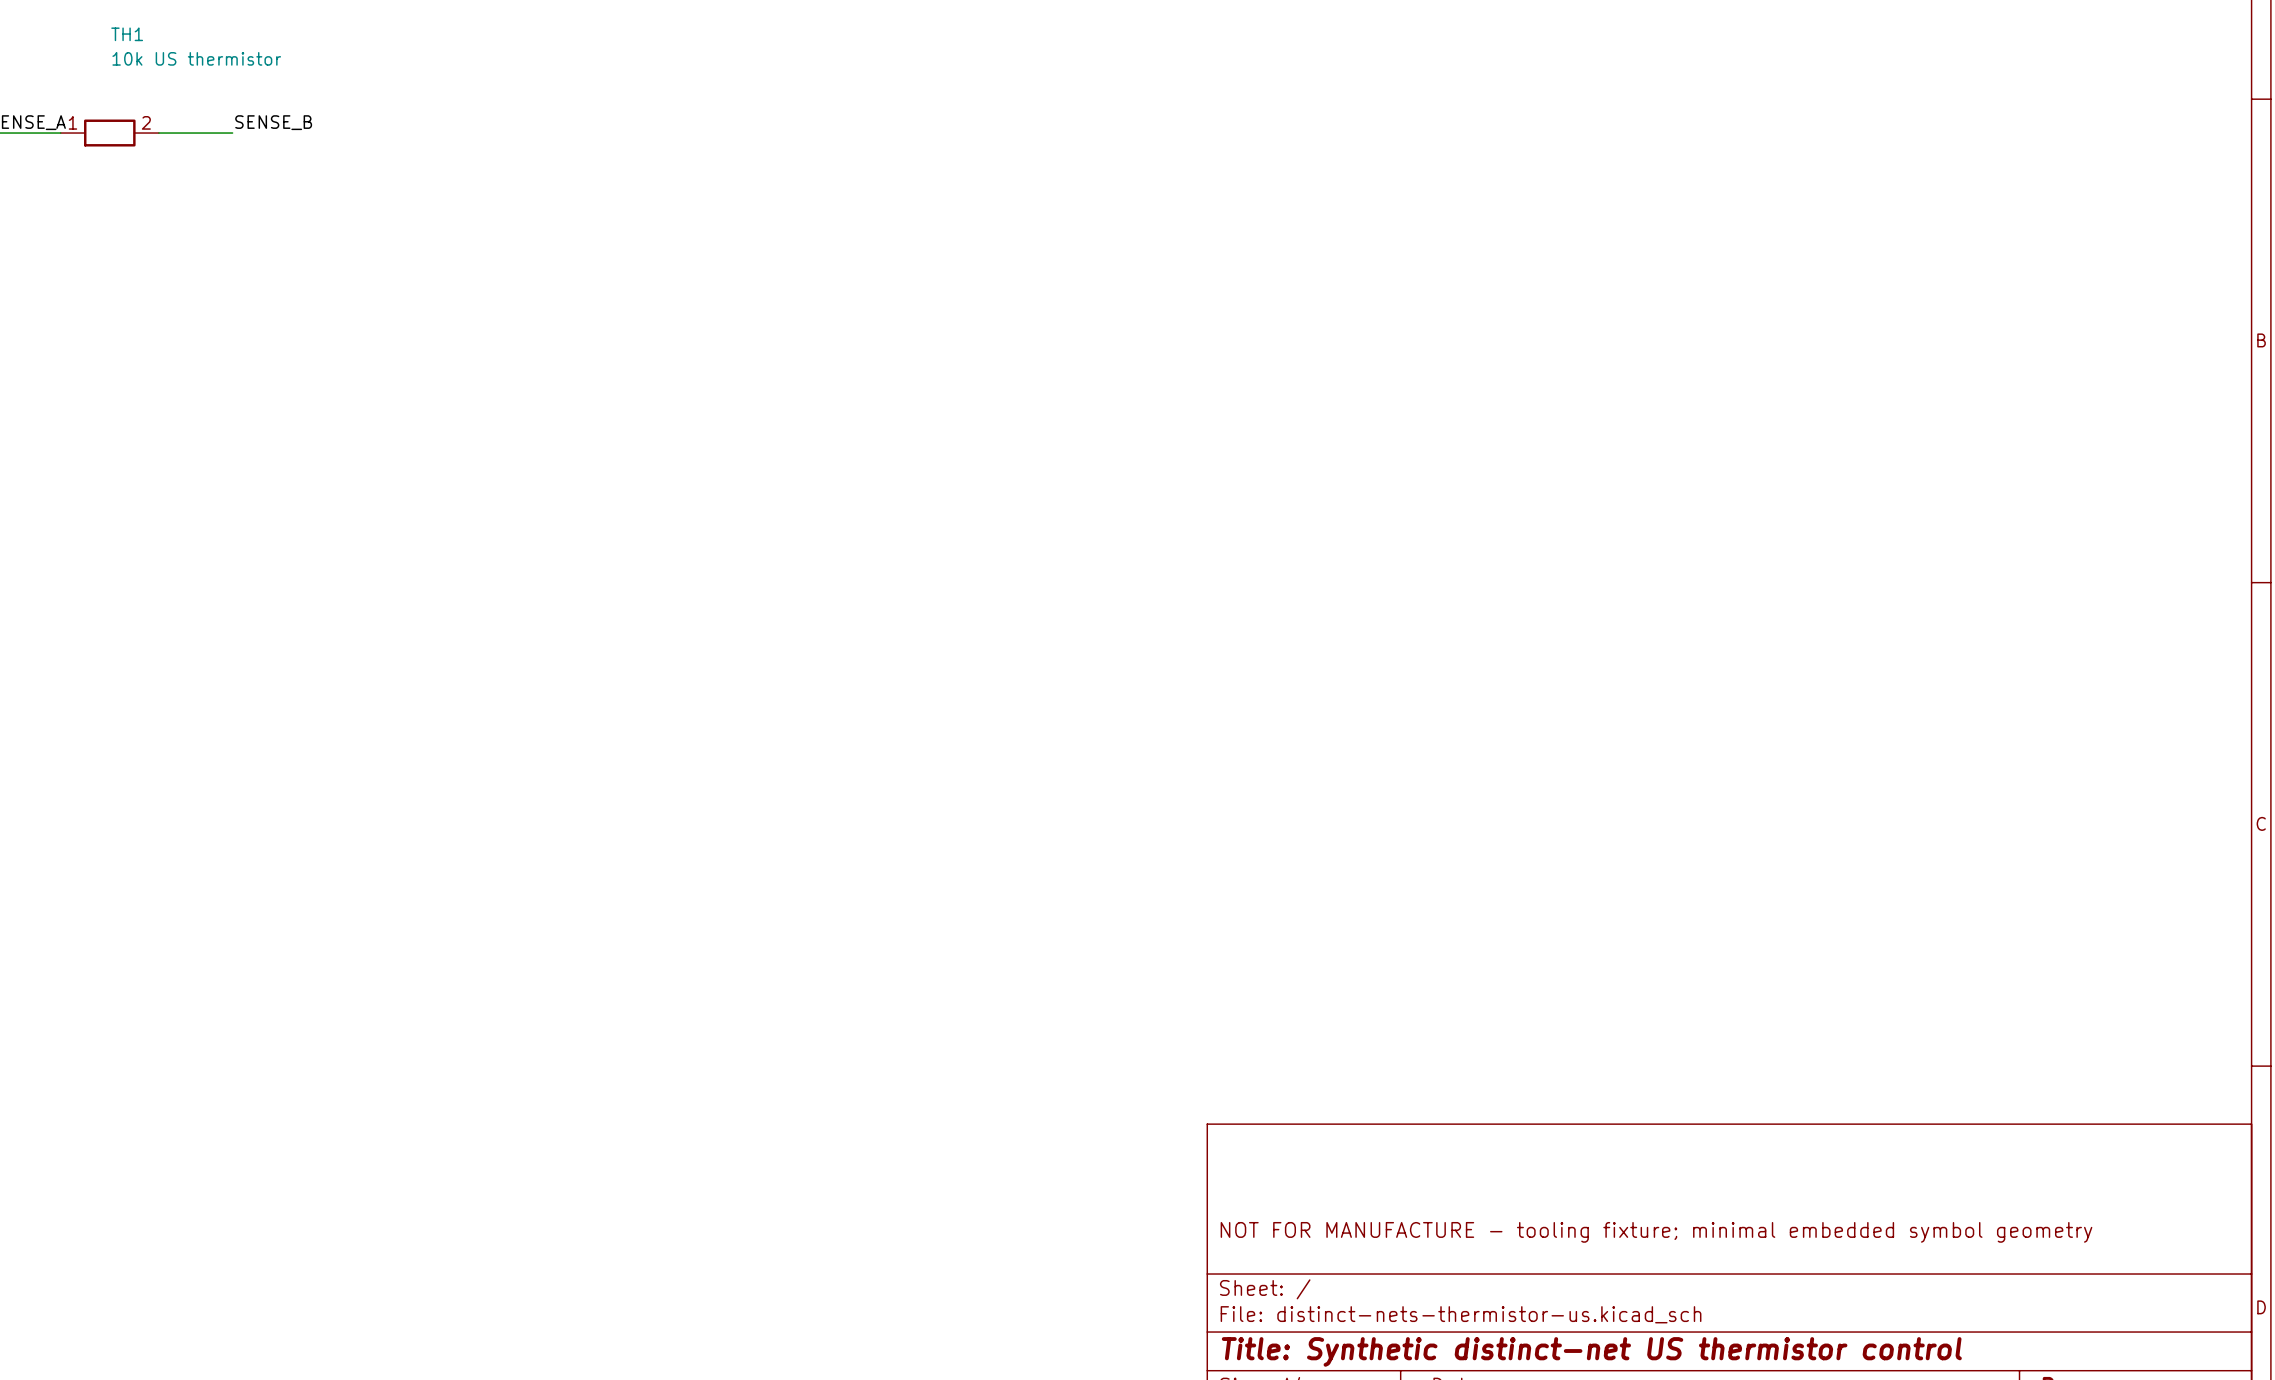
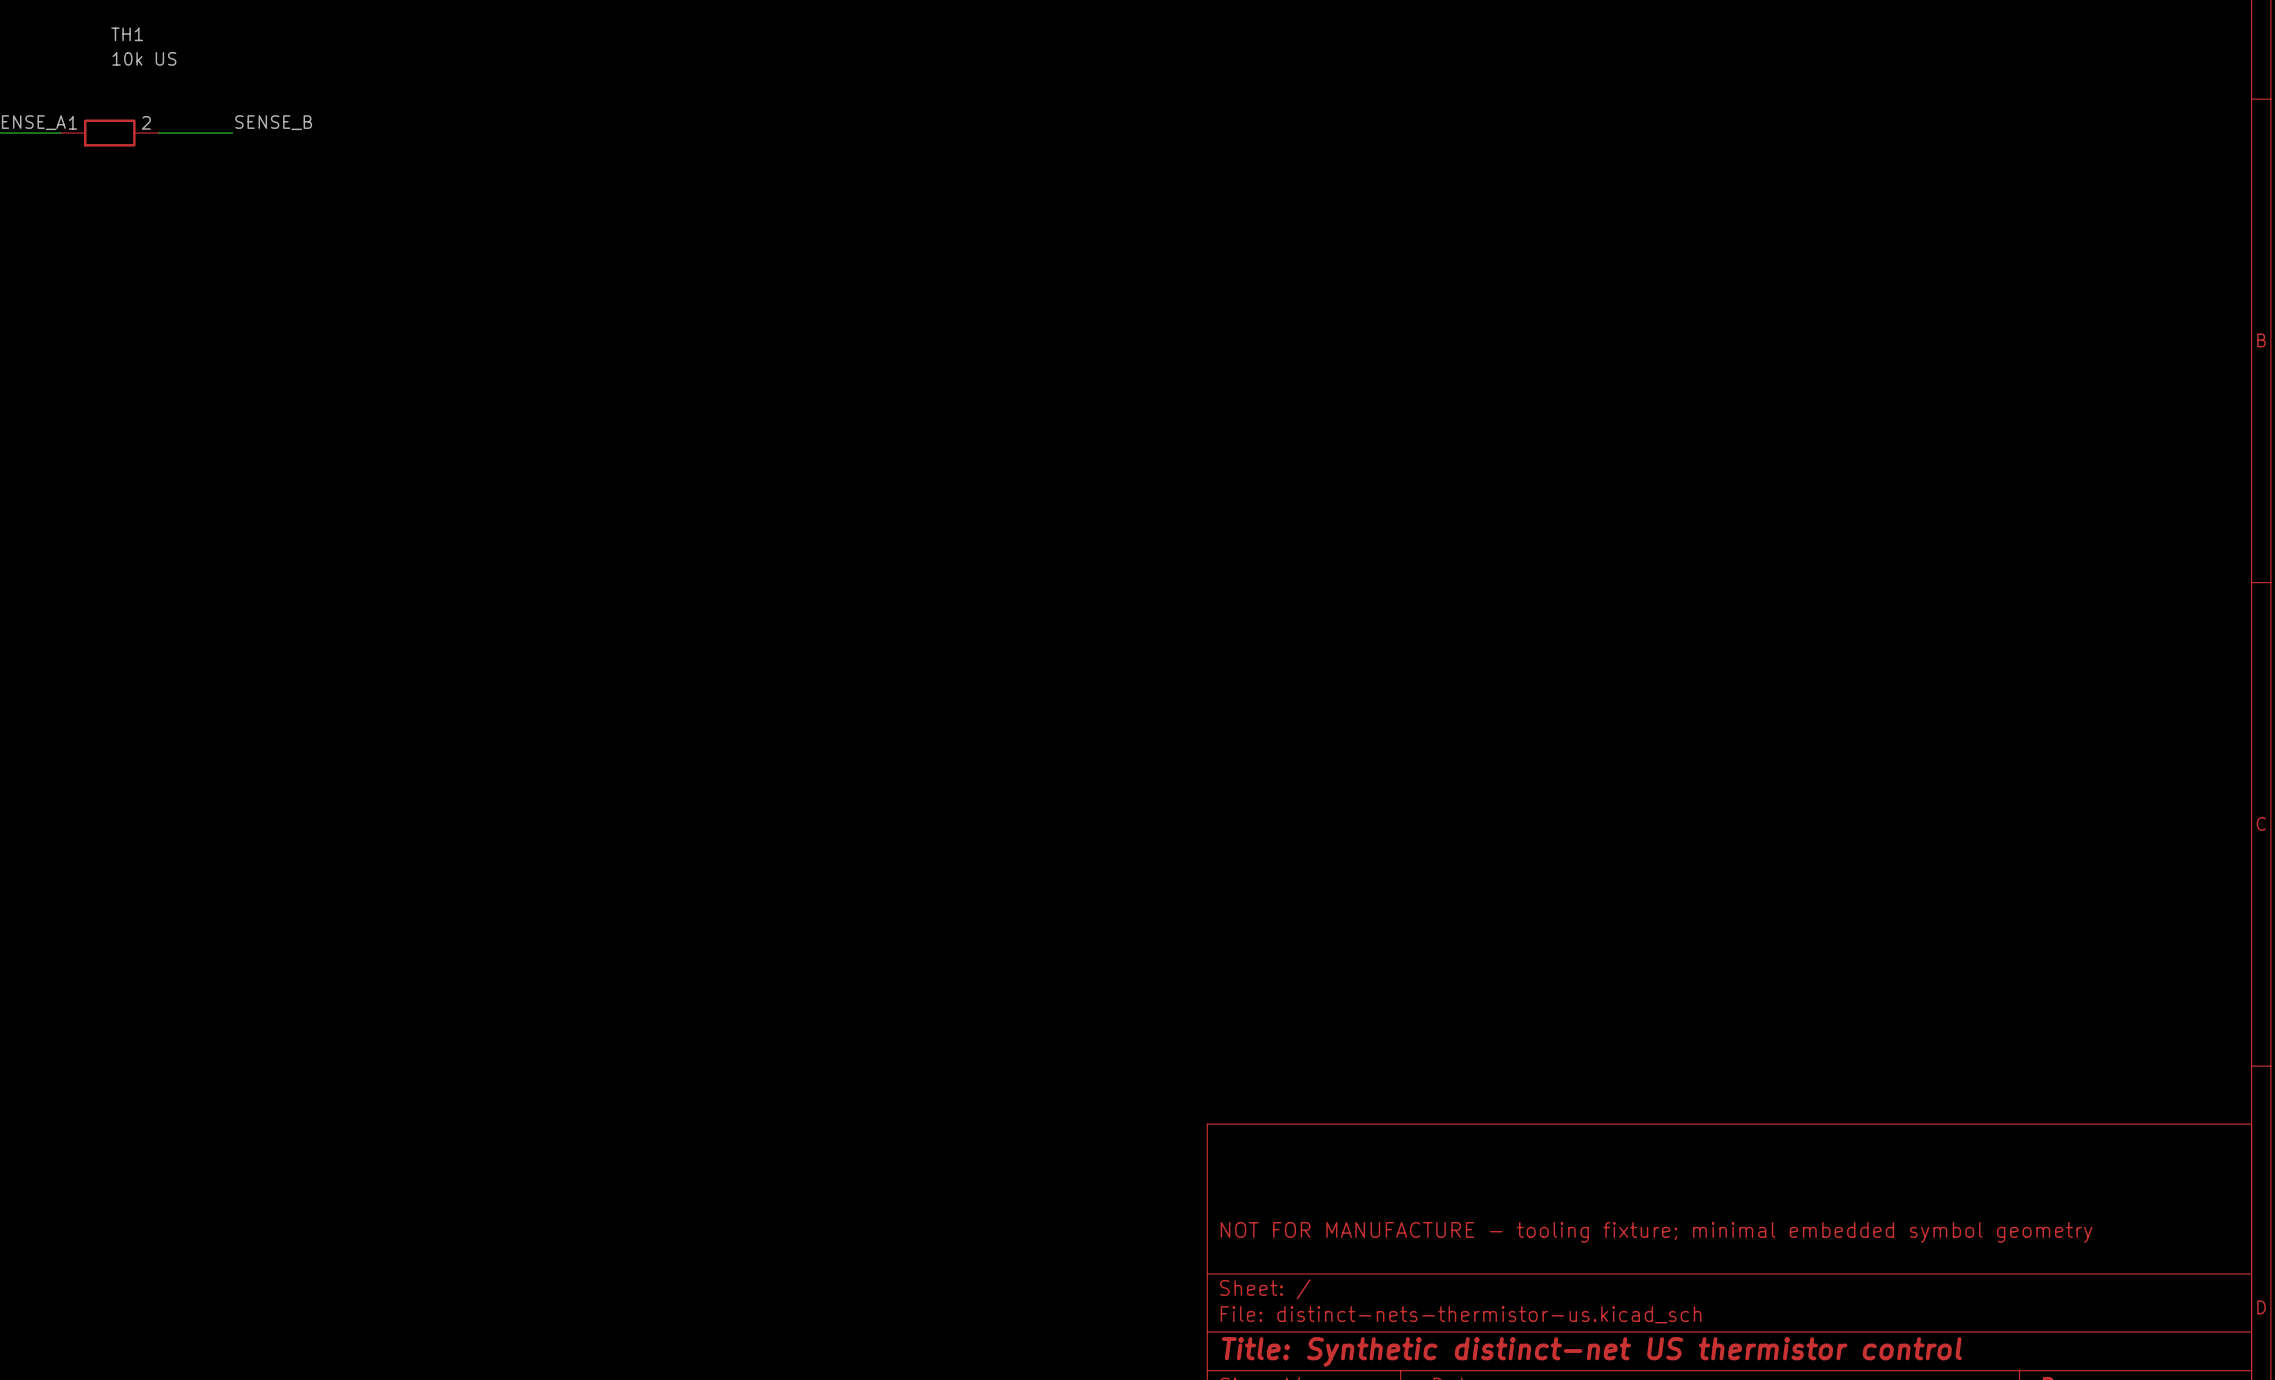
TH1 value: 10k US thermistor (196, 58) -> 10k US (144, 58)

